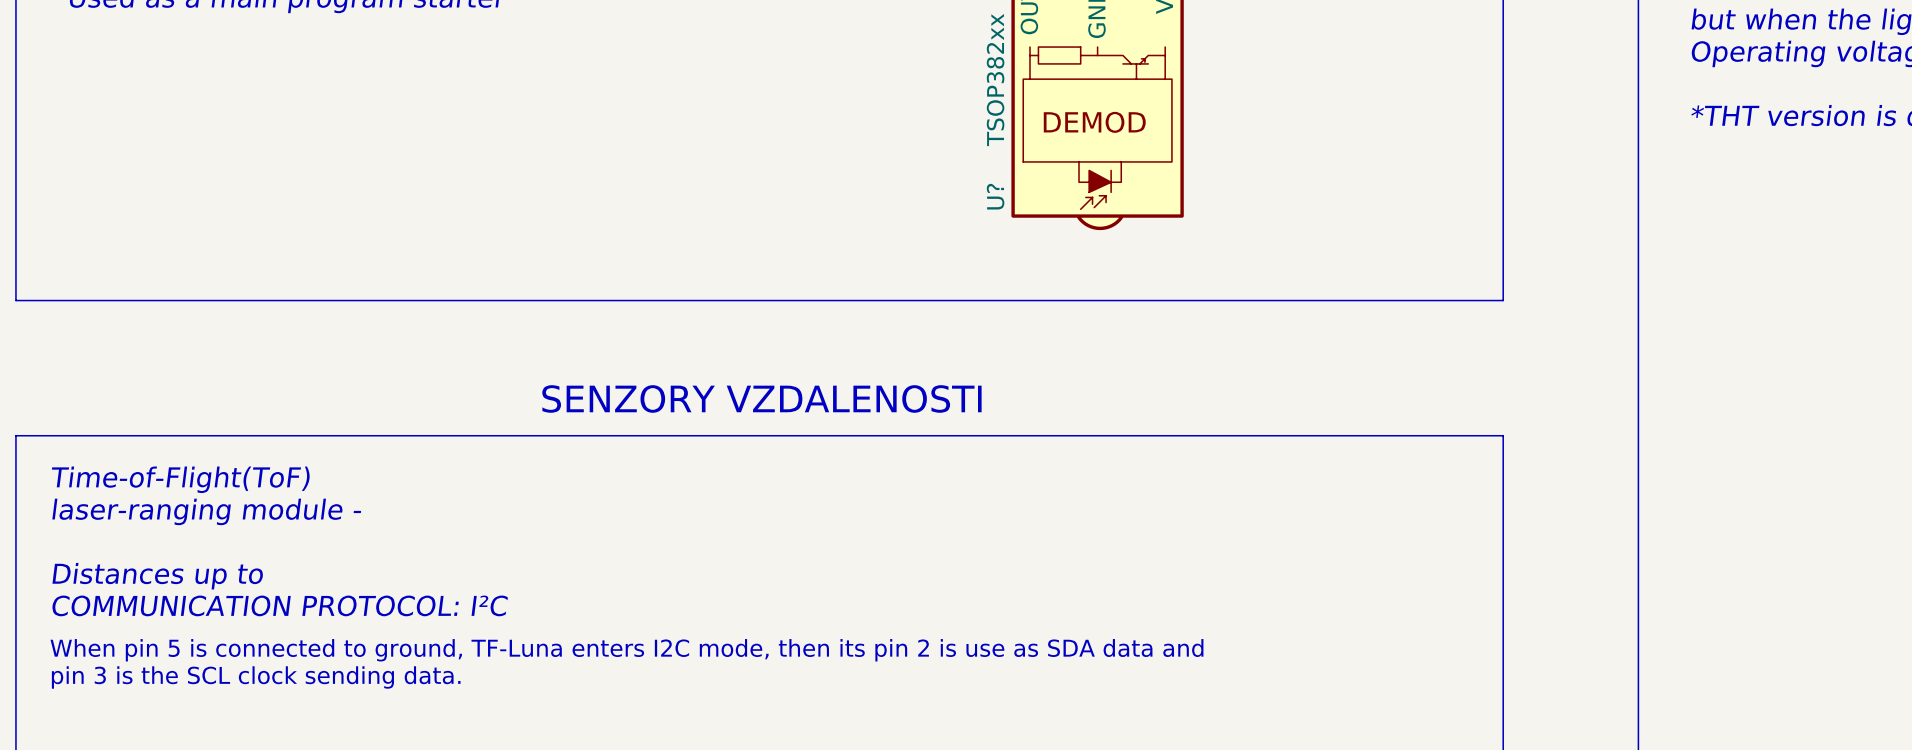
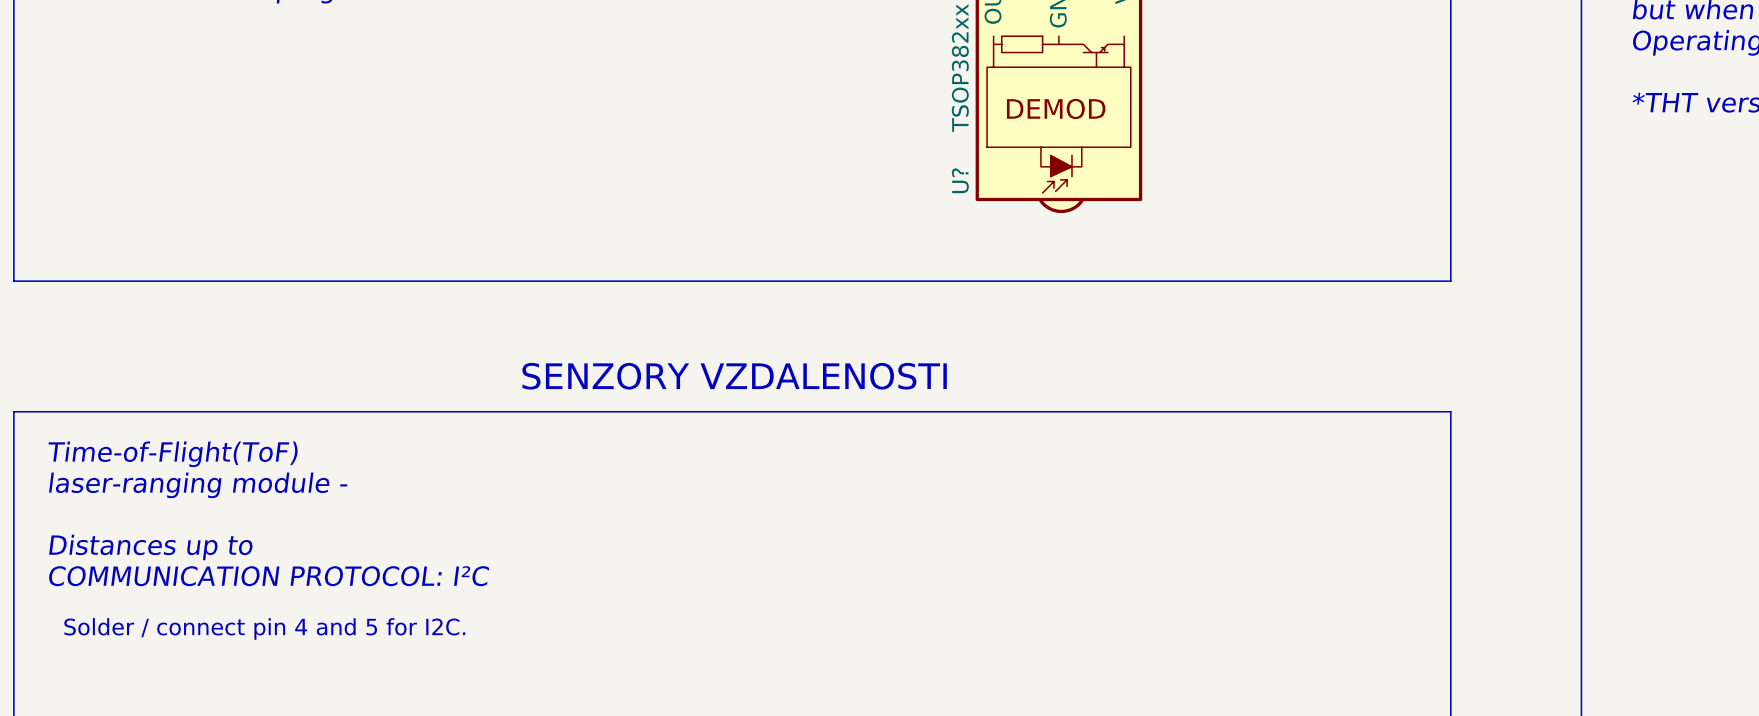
text: When pin 5 is connected to ground, TF-Luna enters I2C mode, then its pin 2 is use as SDA data and (626, 650) -> none
text: none -> Solder / connect pin 4 and 5 for I2C. (264, 628)
text: pin 3 is the SCL clock sending data. (256, 677) -> none

